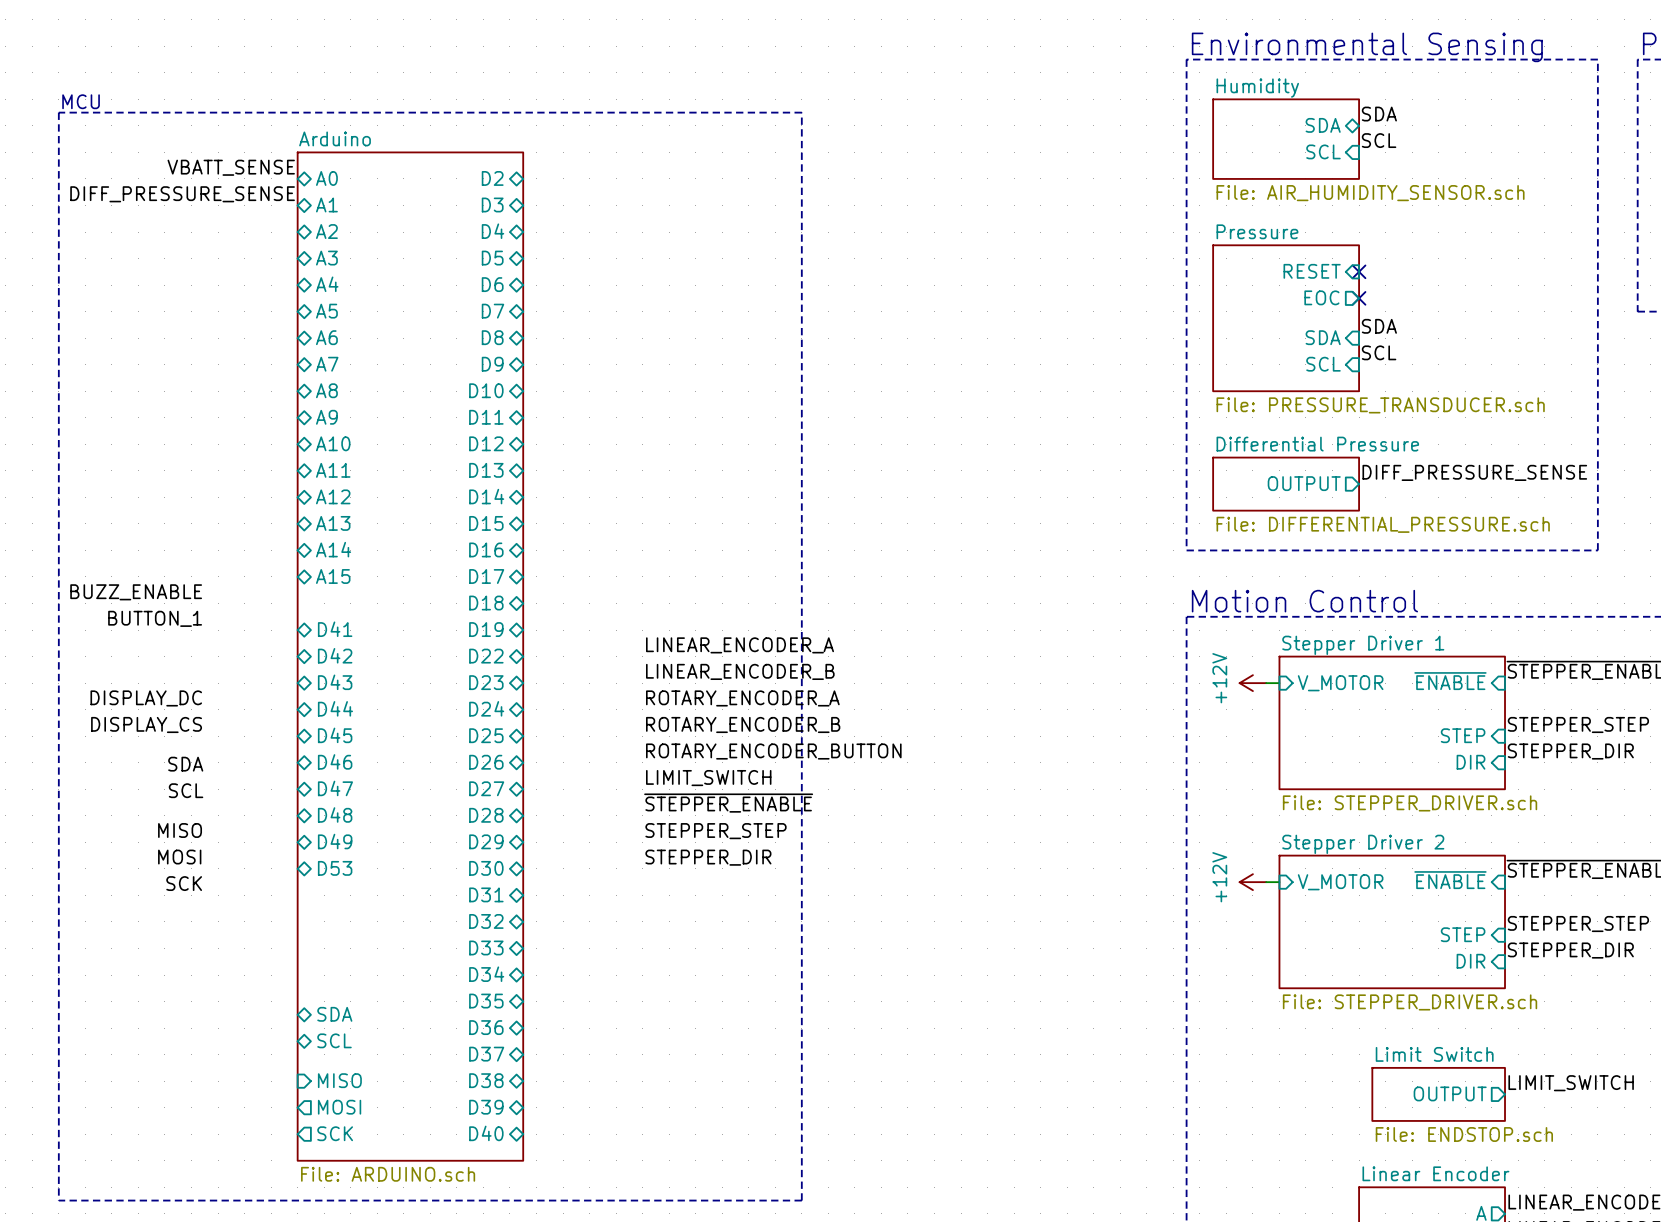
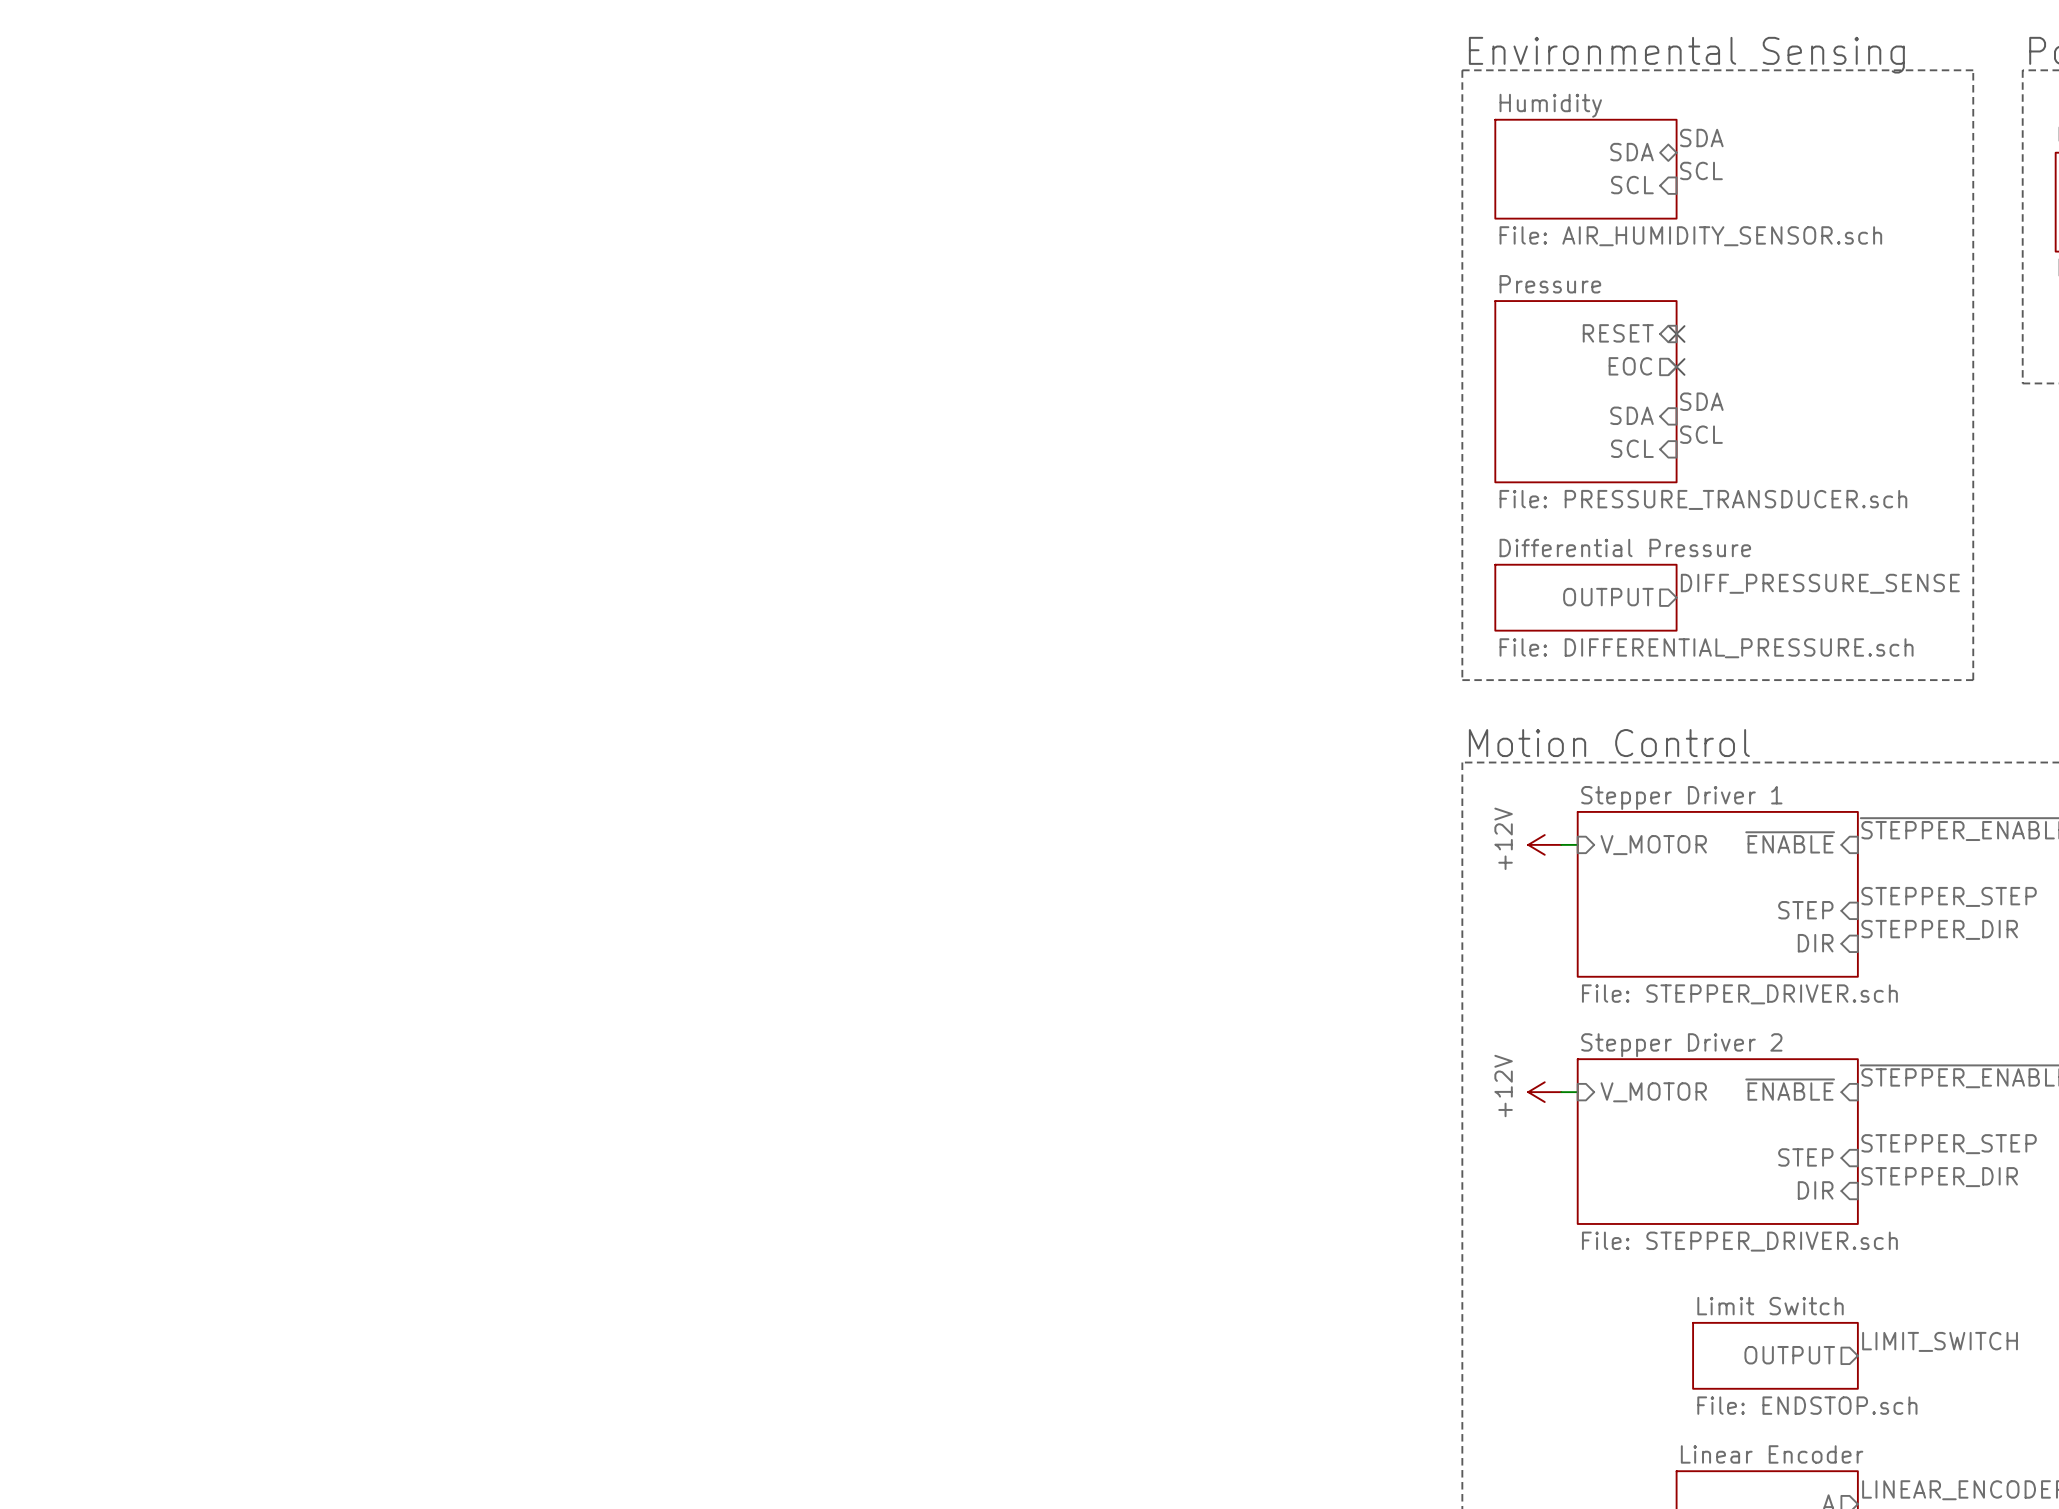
text: MCU (81, 101) -> none
line: (58, 112) (58, 1200) (801, 1200) (801, 112) (58, 112) -> none
label: VBATT_SENSE (231, 167) -> none
sheet pin: A0 (326, 178) -> none
sheet pin: D2 (492, 178) -> none
label: DIFF_PRESSURE_SENSE (182, 194) -> none
sheet pin: A1 (326, 204) -> none
sheet pin: D3 (492, 204) -> none
sheet pin: A2 (326, 231) -> none
sheet pin: D4 (492, 231) -> none
sheet pin: A3 (326, 258) -> none
sheet pin: D5 (492, 258) -> none
sheet pin: A4 (327, 284) -> none
sheet pin: D6 (492, 284) -> none
sheet pin: A5 (326, 311) -> none
sheet pin: D7 (492, 311) -> none
sheet pin: A6 (326, 337) -> none
sheet pin: D8 (492, 337) -> none
sheet pin: A7 (327, 364) -> none
sheet pin: D9 (492, 364) -> none
sheet pin: A8 (326, 390) -> none
sheet pin: D10 (486, 390) -> none
sheet pin: A9 (326, 417) -> none
sheet pin: D11 (486, 417) -> none
sheet pin: A10 (333, 443) -> none
sheet pin: D12 (486, 443) -> none
sheet pin: A11 (333, 470) -> none
sheet pin: D13 (486, 470) -> none
sheet pin: A12 (333, 496) -> none
sheet pin: D14 (486, 496) -> none
sheet pin: A13 (333, 523) -> none
sheet pin: D15 (486, 523) -> none
sheet pin: A14 (333, 549) -> none
sheet pin: D16 (486, 549) -> none
sheet pin: A15 (333, 576) -> none
sheet pin: D17 (486, 576) -> none
label: BUZZ_ENABLE (136, 592) -> none
sheet pin: D18 (486, 603) -> none
label: BUTTON_1 (155, 618) -> none
sheet pin: D41 (335, 629) -> none
sheet pin: D19 (486, 629) -> none
label: LINEAR_ENCODER_A (740, 645) -> none
sheet pin: D42 (335, 655) -> none
sheet Arduino: File: ARDUINO.sch (410, 656) -> none
sheet pin: D22 (486, 656) -> none
label: LINEAR_ENCODER_B (740, 671) -> none
sheet pin: D43 (335, 682) -> none
sheet pin: D23 (486, 682) -> none
label: DISPLAY_DC (146, 698) -> none
label: ROTARY_ENCODER_A (742, 698) -> none
sheet pin: D44 (335, 708) -> none
sheet pin: D24 (486, 708) -> none
label: DISPLAY_CS (146, 724) -> none
label: ROTARY_ENCODER_B (743, 724) -> none
sheet pin: D45 (335, 735) -> none
sheet pin: D25 (486, 735) -> none
label: ROTARY_ENCODER_BUTTON (773, 751) -> none
sheet pin: D46 (335, 761) -> none
sheet pin: D26 (486, 762) -> none
label: SDA (185, 764) -> none
label: LIMIT_SWITCH (708, 778) -> none
sheet pin: D47 (335, 788) -> none
sheet pin: D27 (486, 788) -> none
label: SCL (186, 790) -> none
label: ~{STEPPER_ENABLE} (728, 803) -> none
sheet pin: D48 (335, 814) -> none
sheet pin: D28 (486, 815) -> none
label: MISO (180, 830) -> none
label: STEPPER_STEP (716, 831) -> none
sheet pin: D49 (335, 841) -> none
sheet pin: D29 (486, 841) -> none
label: MOSI (179, 857) -> none
label: STEPPER_DIR (708, 857) -> none
sheet pin: D53 (335, 868) -> none
sheet pin: D30 (486, 868) -> none
label: SCK (184, 883) -> none
sheet pin: D31 (486, 894) -> none
sheet pin: D32 (486, 921) -> none
sheet pin: D33 (486, 947) -> none
sheet pin: D34 (486, 974) -> none
sheet pin: D35 (486, 1001) -> none
sheet pin: SDA (334, 1014) -> none
sheet pin: D36 (486, 1027) -> none
sheet pin: SCL (334, 1040) -> none
sheet pin: D37 (486, 1054) -> none
sheet pin: MISO (339, 1080) -> none
sheet pin: D38 (486, 1080) -> none
sheet pin: MOSI (339, 1107) -> none
sheet pin: D39 (486, 1107) -> none
sheet pin: SCK (335, 1133) -> none
sheet pin: D40 (486, 1133) -> none

